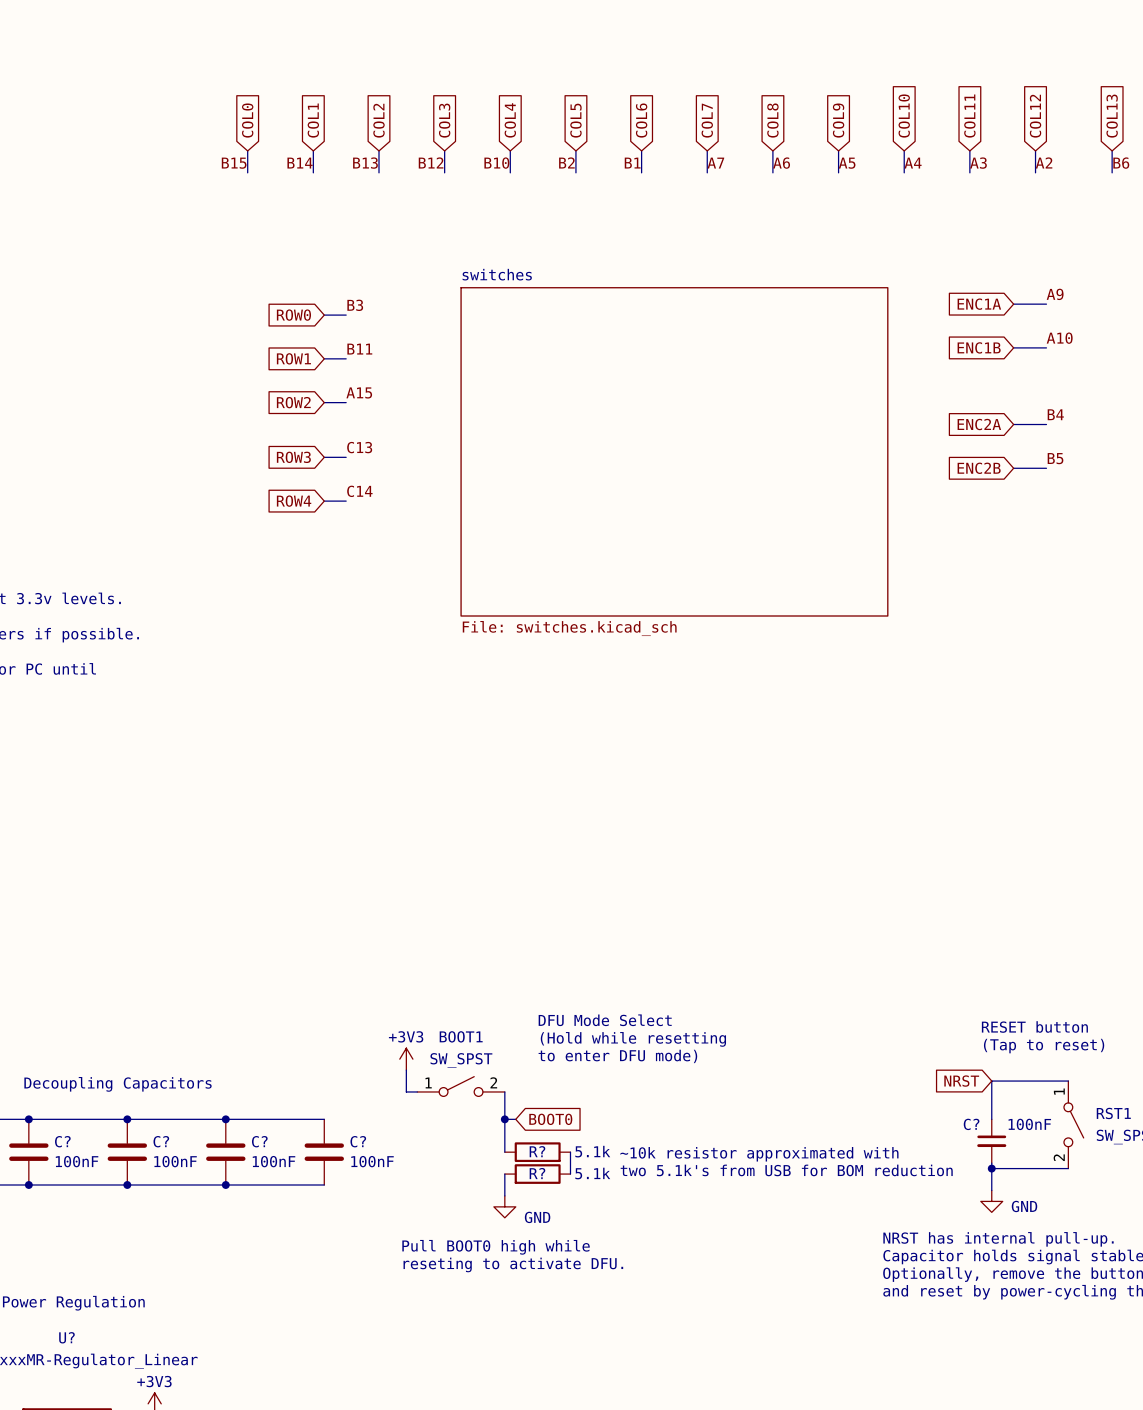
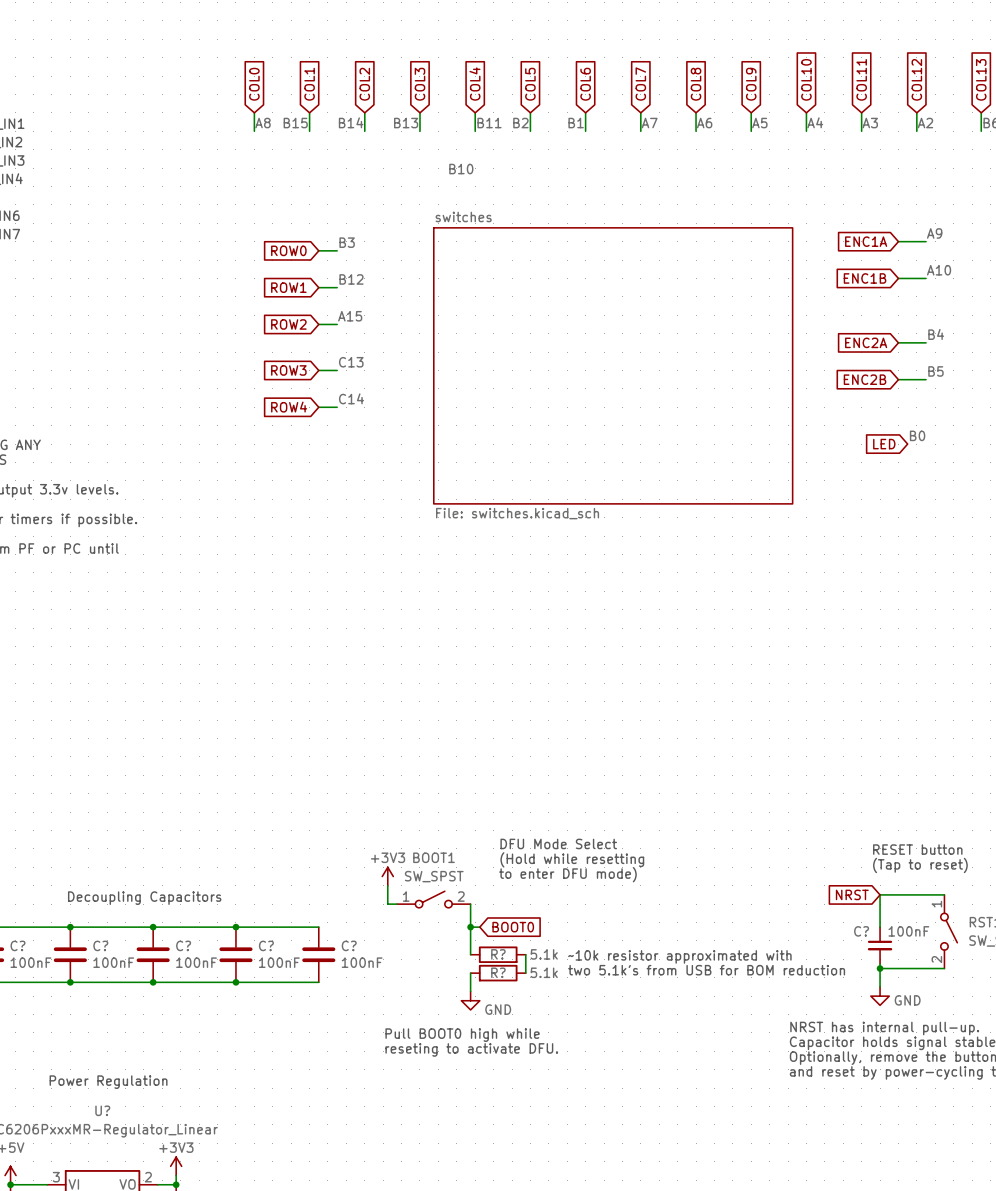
label: B12 (431, 162) -> B13 (406, 123)
label: B15 (234, 163) -> A8 (262, 123)
label: B14 (300, 163) -> B15 (295, 123)
label: B13 (365, 163) -> B14 (351, 122)
label: B10 (496, 163) -> B11 (489, 123)
label: none -> B10 (461, 169)
label: B11 (359, 349) -> B12 (351, 279)
label: none -> B0 (917, 435)
global label: none -> LED (884, 444)

